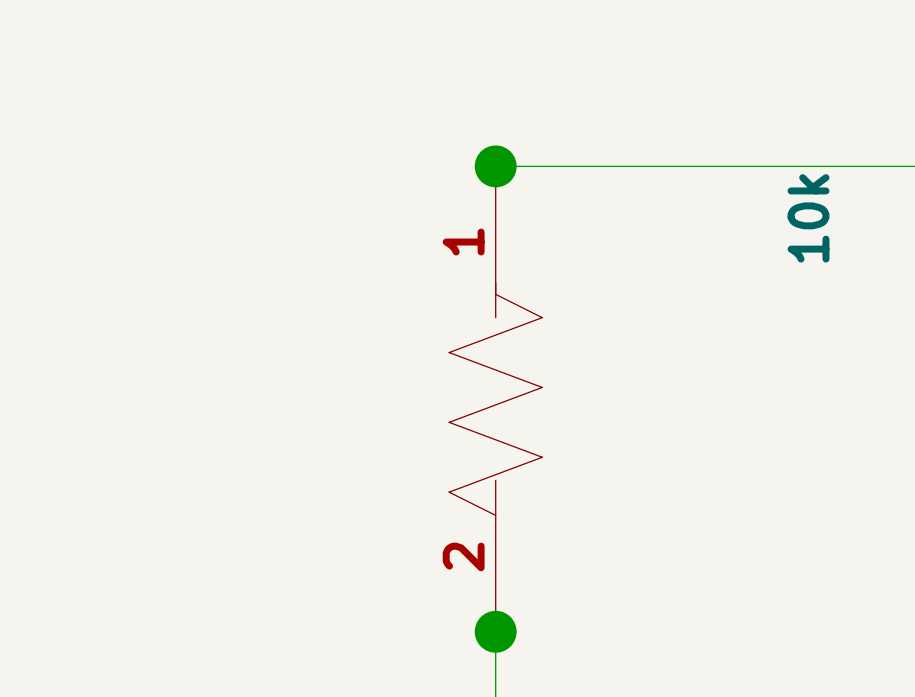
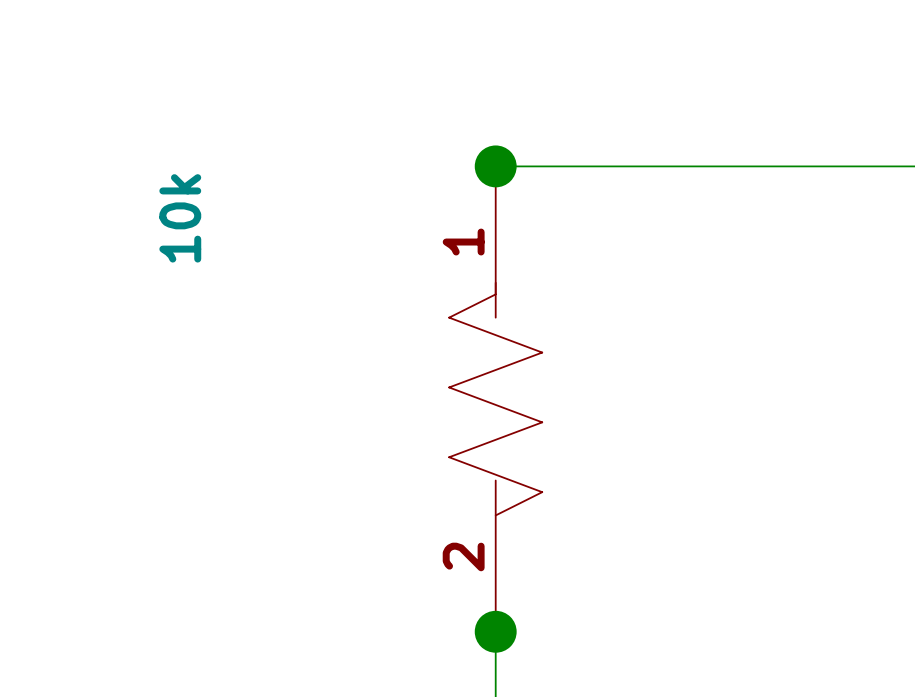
part flip: as is (495, 399) -> left-right (495, 399)

